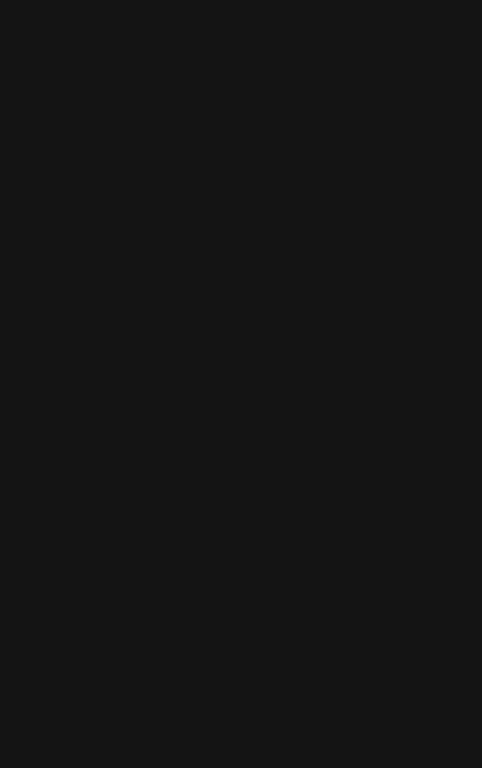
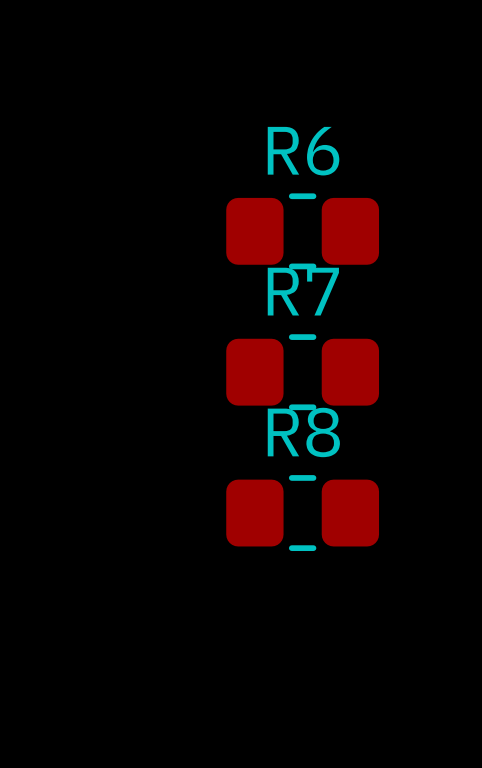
R6: none -> (302, 231)
R7: none -> (302, 372)
R8: none -> (302, 513)

